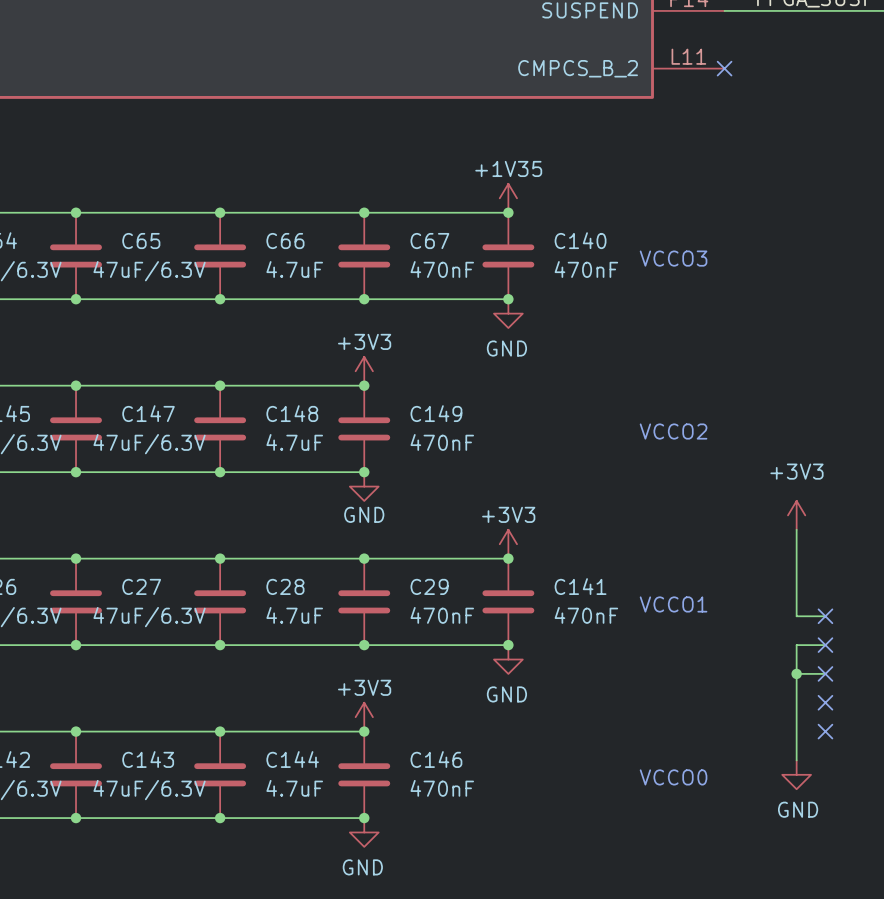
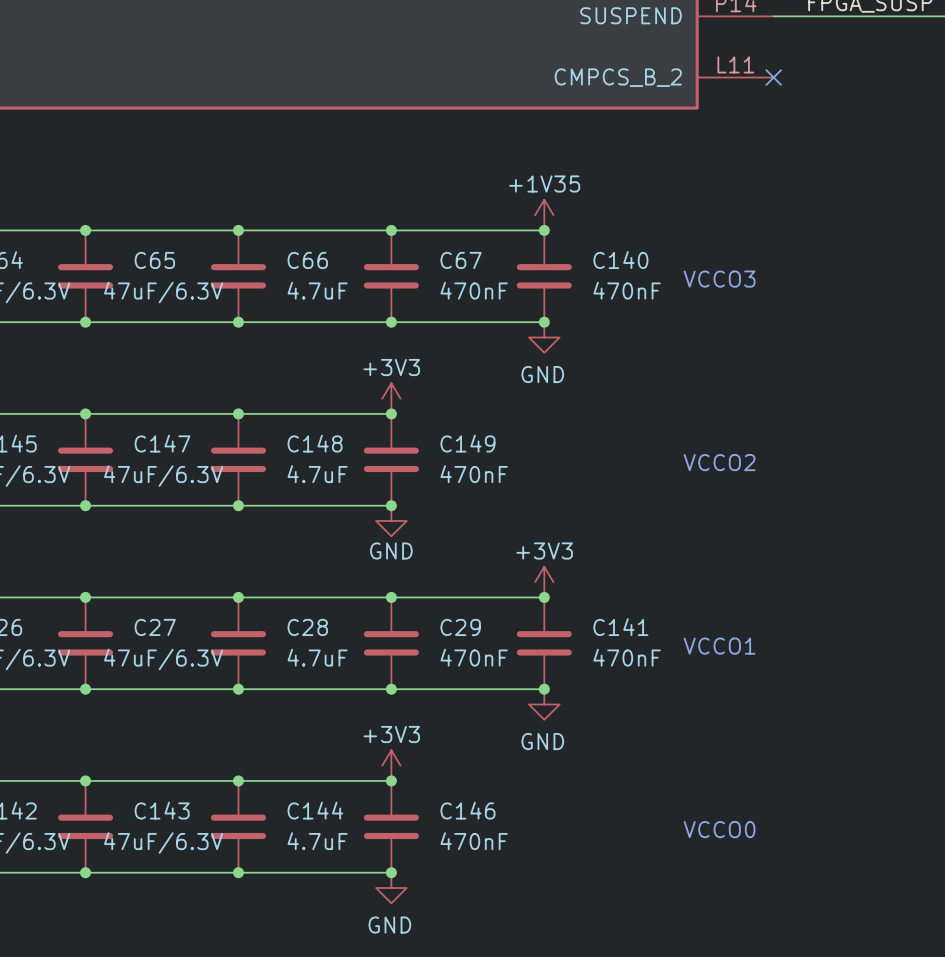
power symbol: +3V3 (796, 515) -> none
wire: (796, 529) (796, 616) (825, 616) -> none
no-connect mark: (825, 616) -> none
wire: (825, 645) (796, 645) (796, 760) -> none
no-connect mark: (825, 645) -> none
wire: (796, 673) (825, 673) -> none
junction: (796, 673) -> none
no-connect mark: (825, 673) -> none
no-connect mark: (825, 702) -> none
no-connect mark: (825, 731) -> none
power symbol: GND (796, 774) -> none

